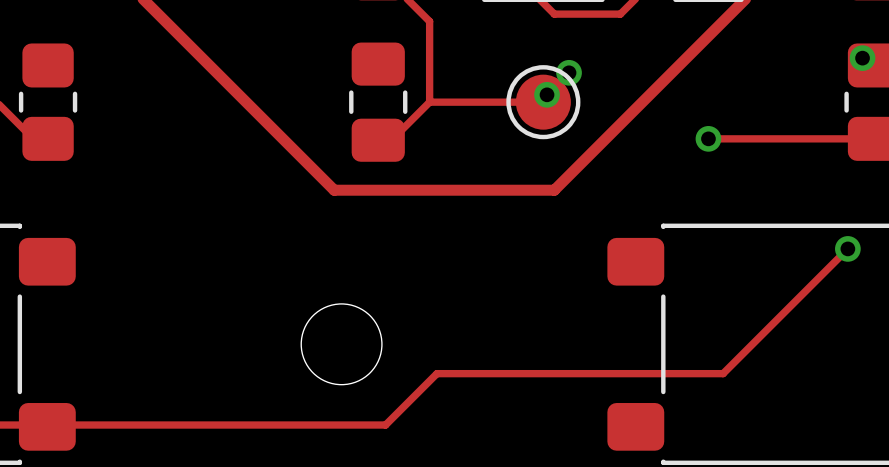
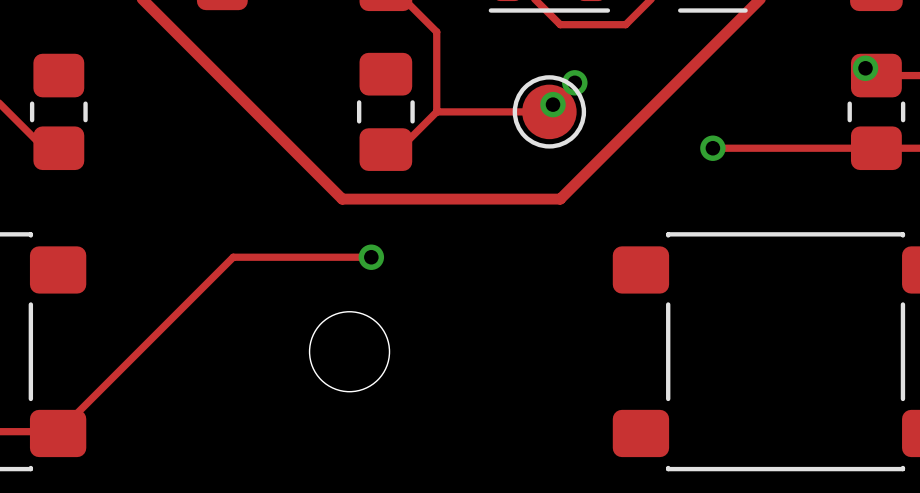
via: none -> (371, 257)
track: (847, 248) (723, 373) (436, 373) (385, 425) (48, 425) -> (371, 257) (233, 257) (58, 431)
via: (847, 248) -> none

